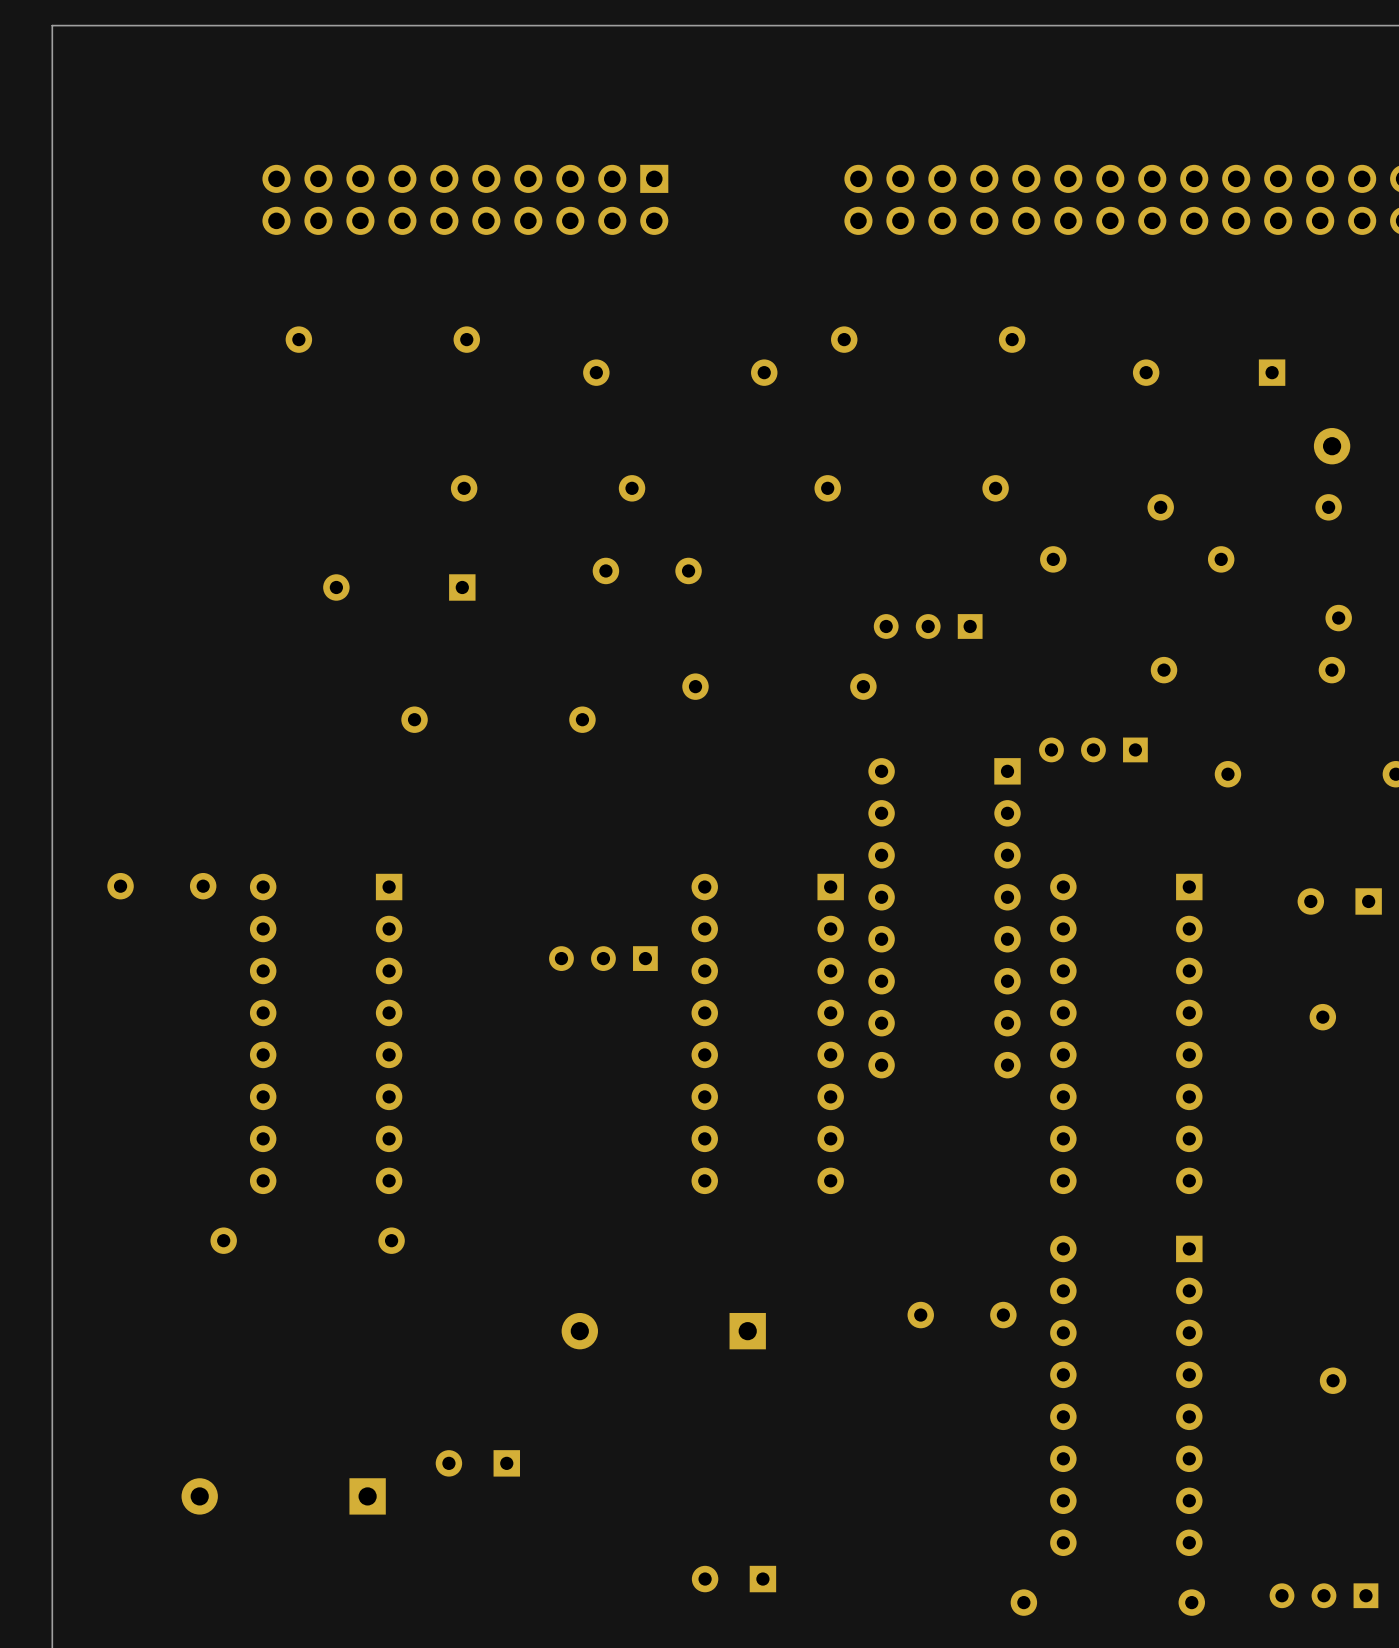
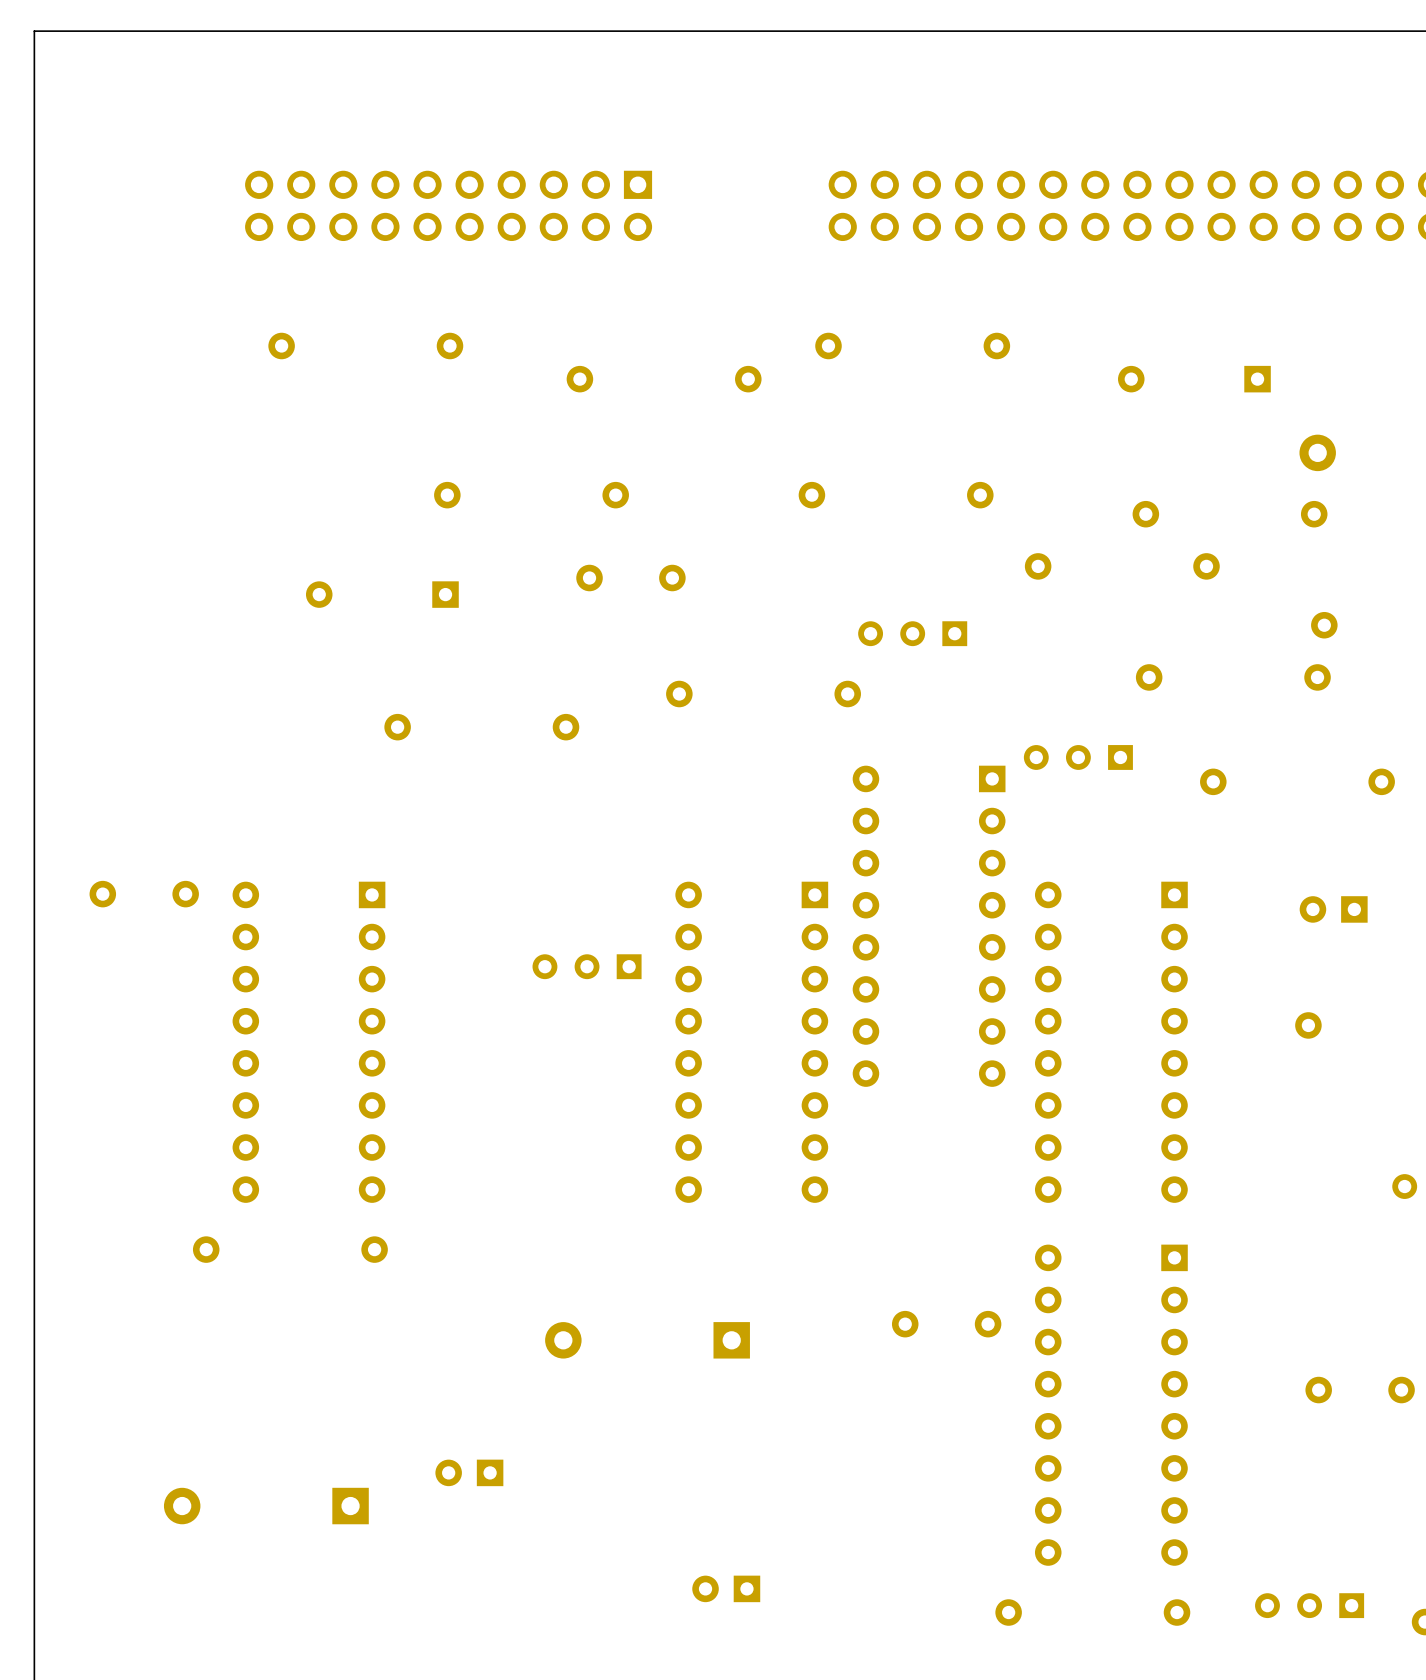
part footprint: [1297, 888, 1382, 915] -> [1299, 896, 1368, 923]
part footprint: [435, 1450, 520, 1477] -> [435, 1459, 504, 1487]
part footprint: [691, 1565, 777, 1593] -> [692, 1575, 761, 1603]

